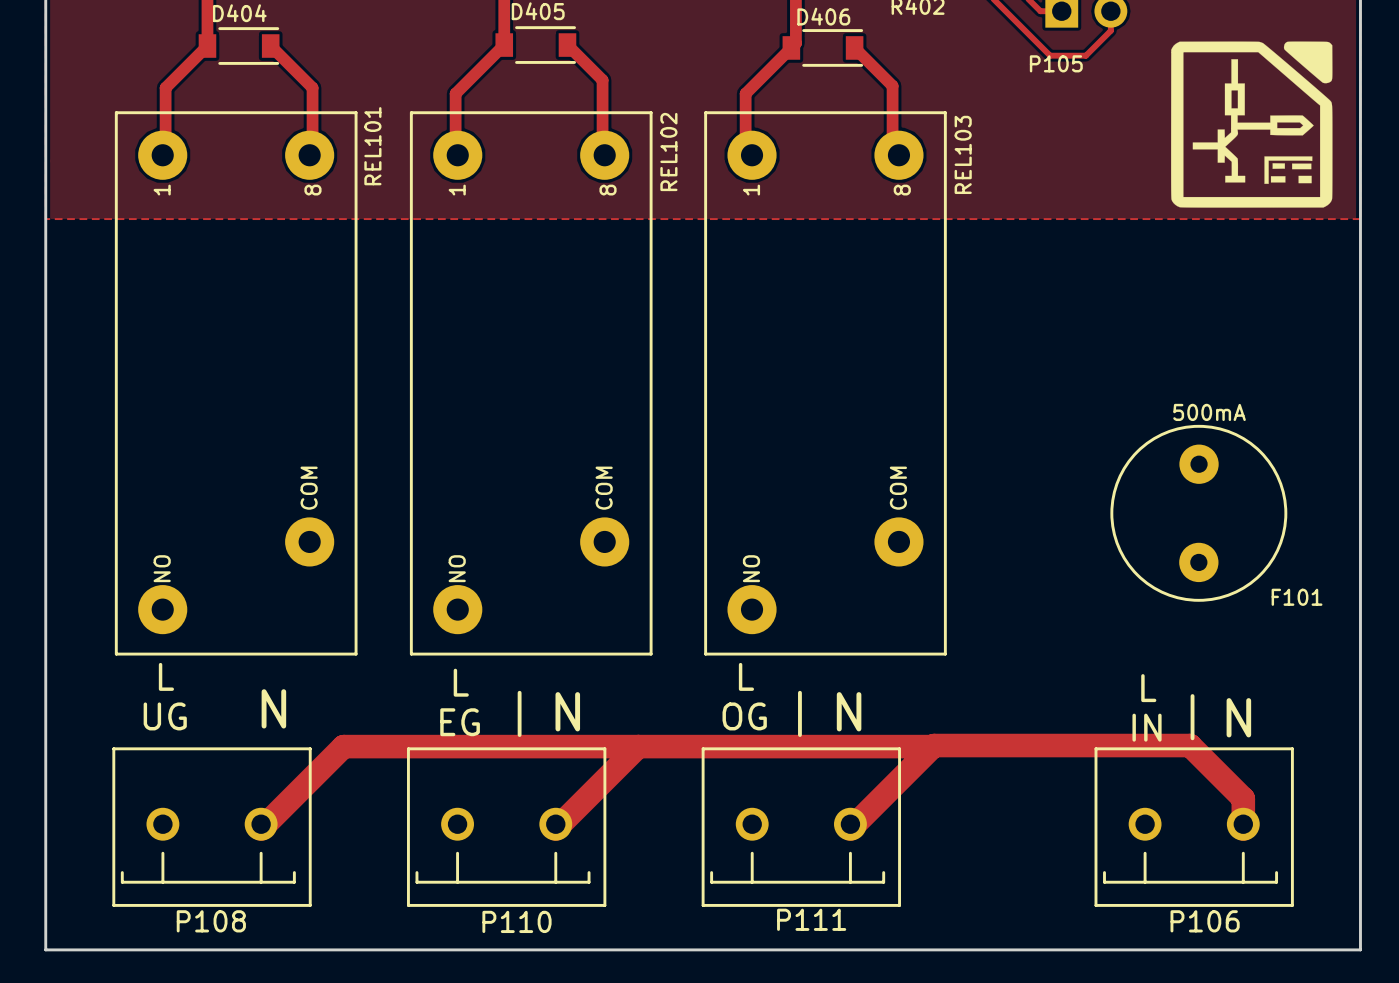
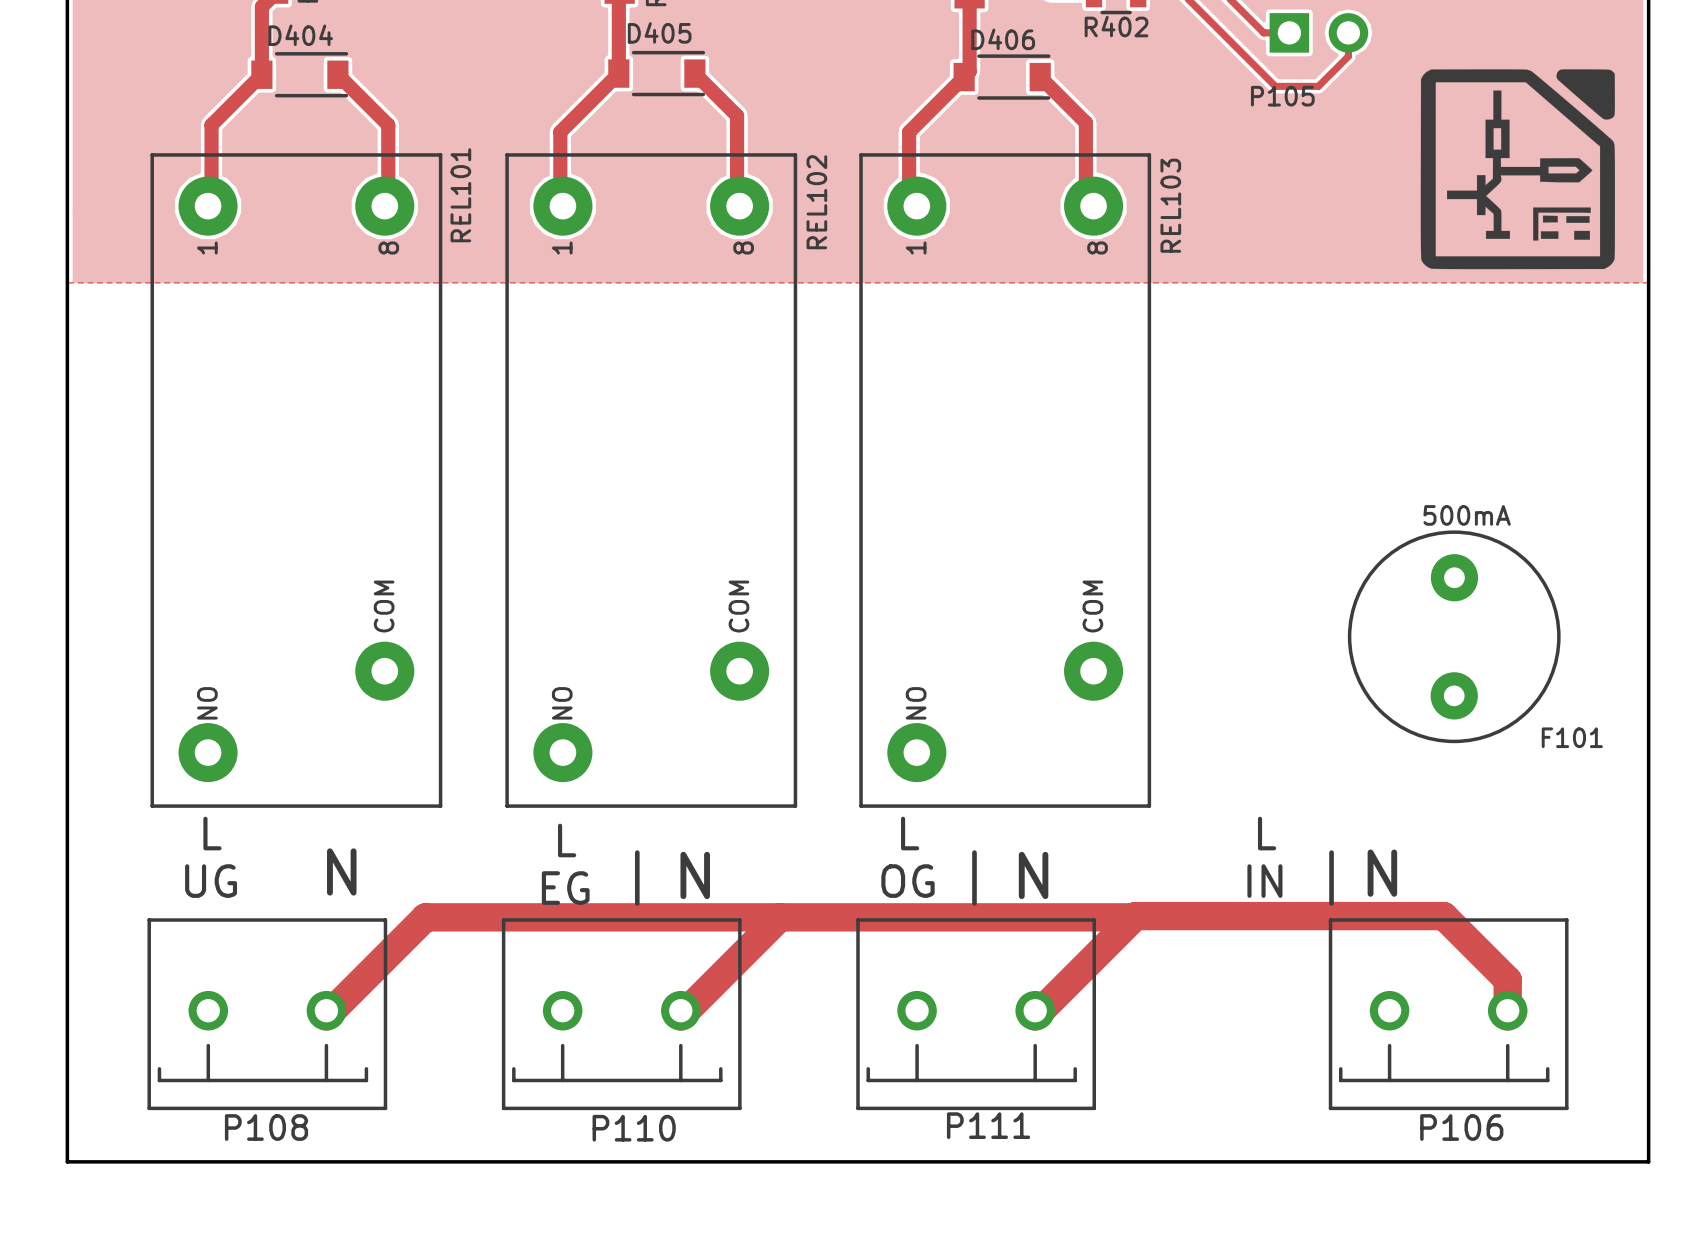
text position: L (1148, 688) -> L (1267, 833)
line: (1192, 696) (1192, 738) -> (1331, 852) (1331, 903)
text position: N (1238, 717) -> N (1382, 873)
text position: IN (1147, 727) -> IN (1264, 881)

